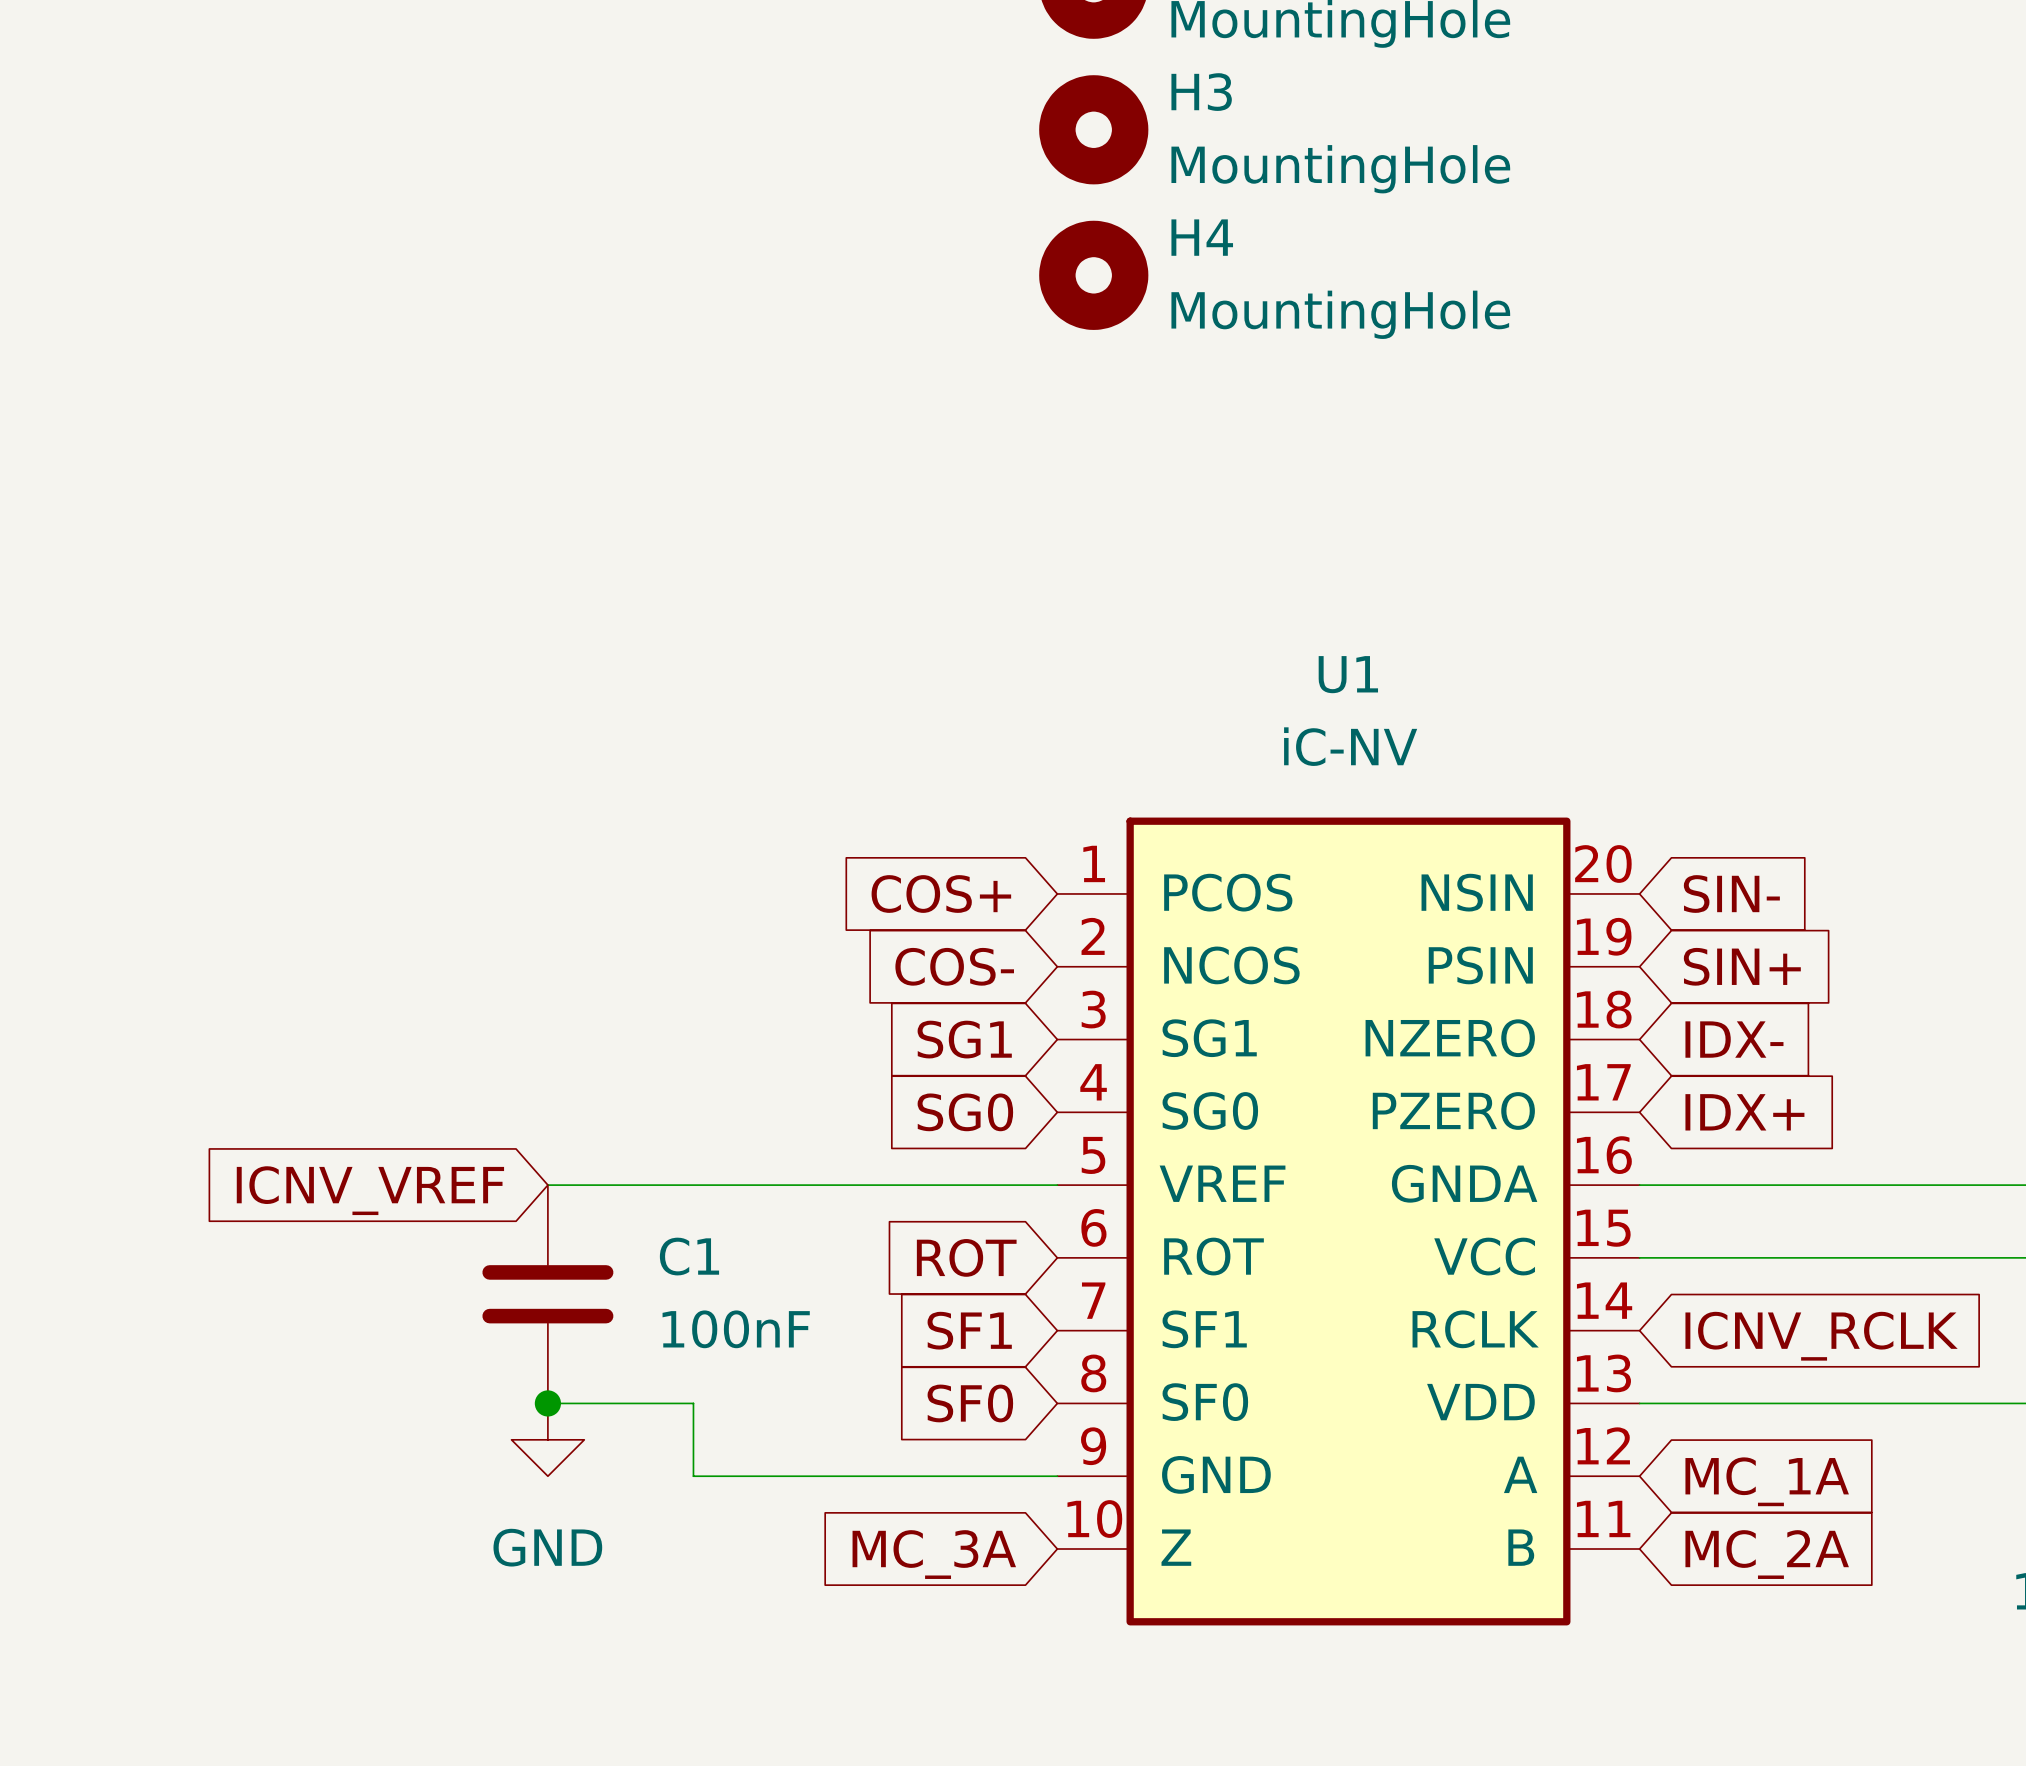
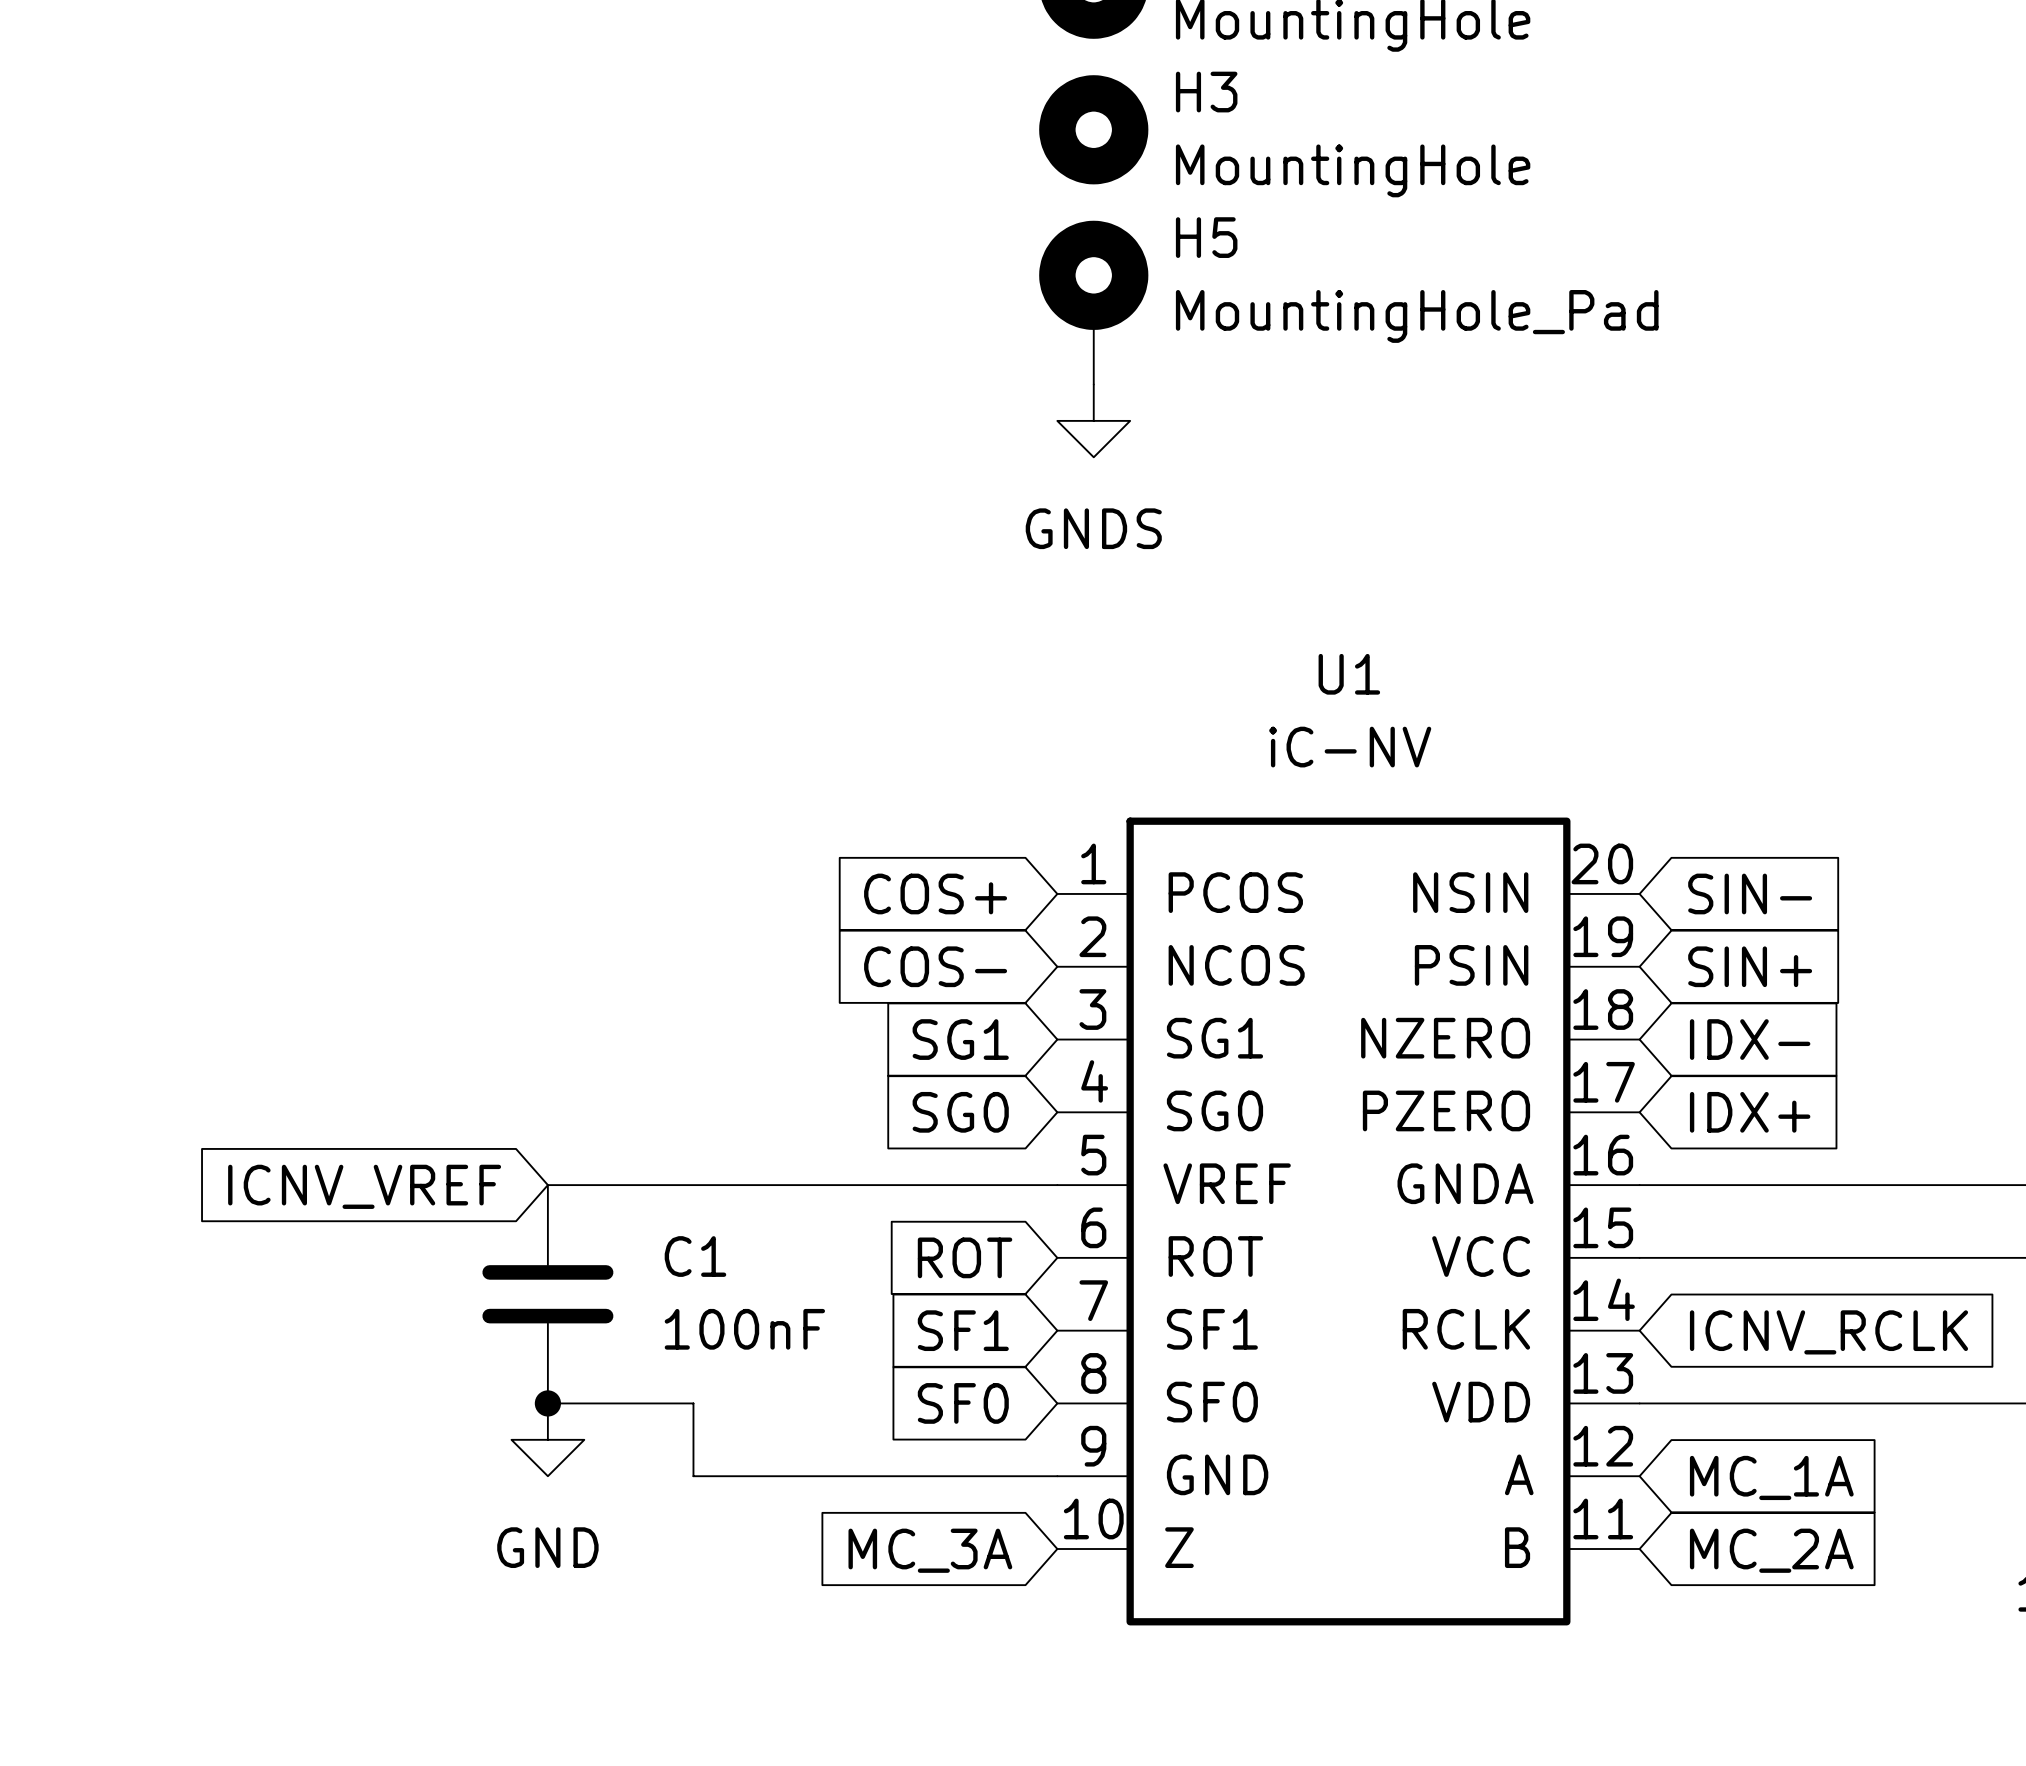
H4: MountingHole (1093, 275) -> none
H5: none -> MountingHole_Pad (1093, 302)
power symbol: none -> GNDS (1093, 420)

